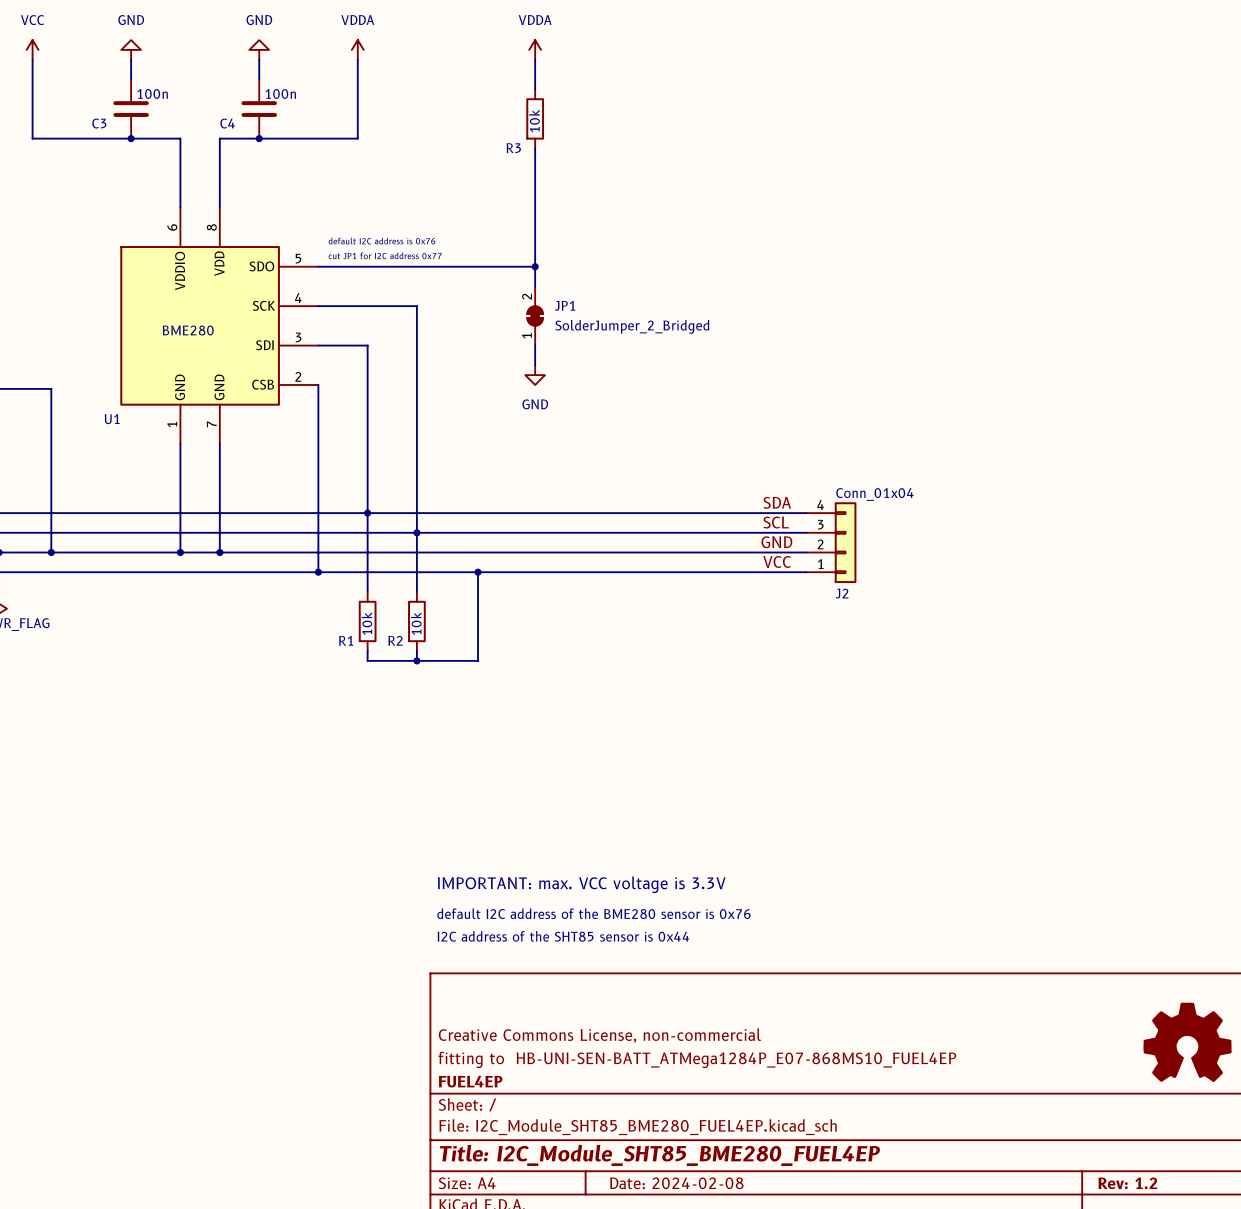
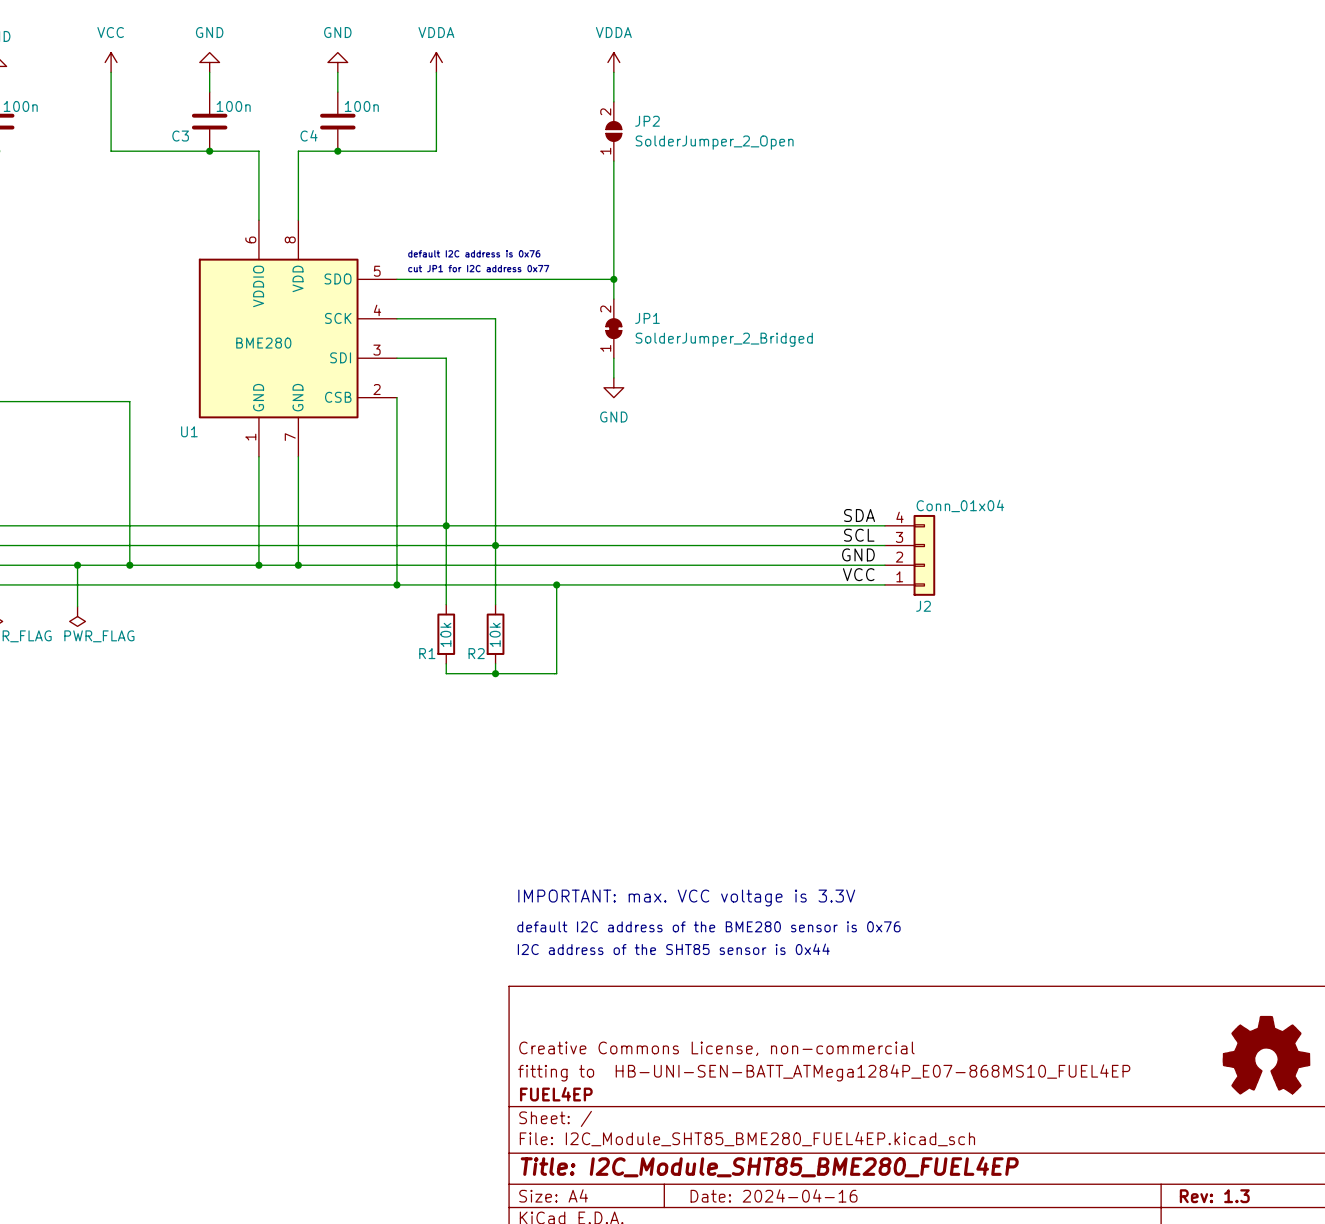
R3: 10k (535, 118) -> none
JP2: none -> SolderJumper_2_Open (613, 131)
title block: Date: 2024-02-08 (676, 1183) -> Date: 2024-04-16 (774, 1195)
title block: Rev: 1.2 (1127, 1183) -> Rev: 1.3 (1214, 1196)

